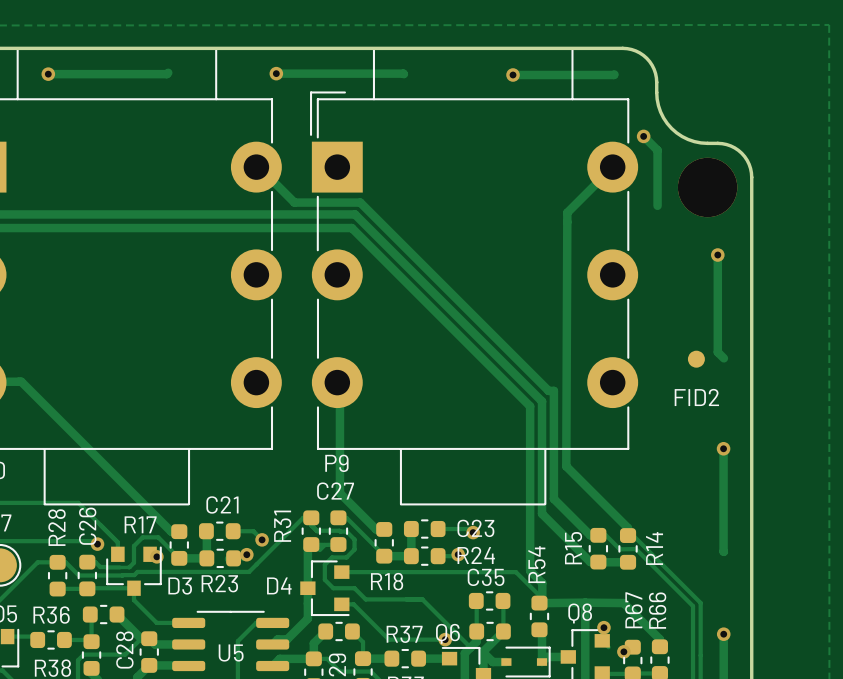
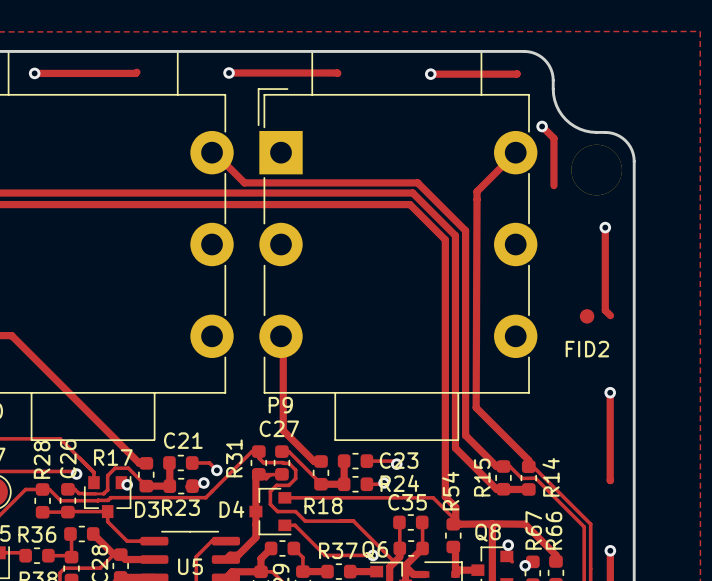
track: (360, 202) (548, 390) (553, 390) -> (300, 182) (417, 182) (465, 230) (465, 343)
track: (355, 214) (542, 401) -> (296, 193) (412, 193) (455, 235) (455, 352)
track: (351, 228) (530, 406) -> (293, 204) (410, 204) (445, 239) (445, 356)

